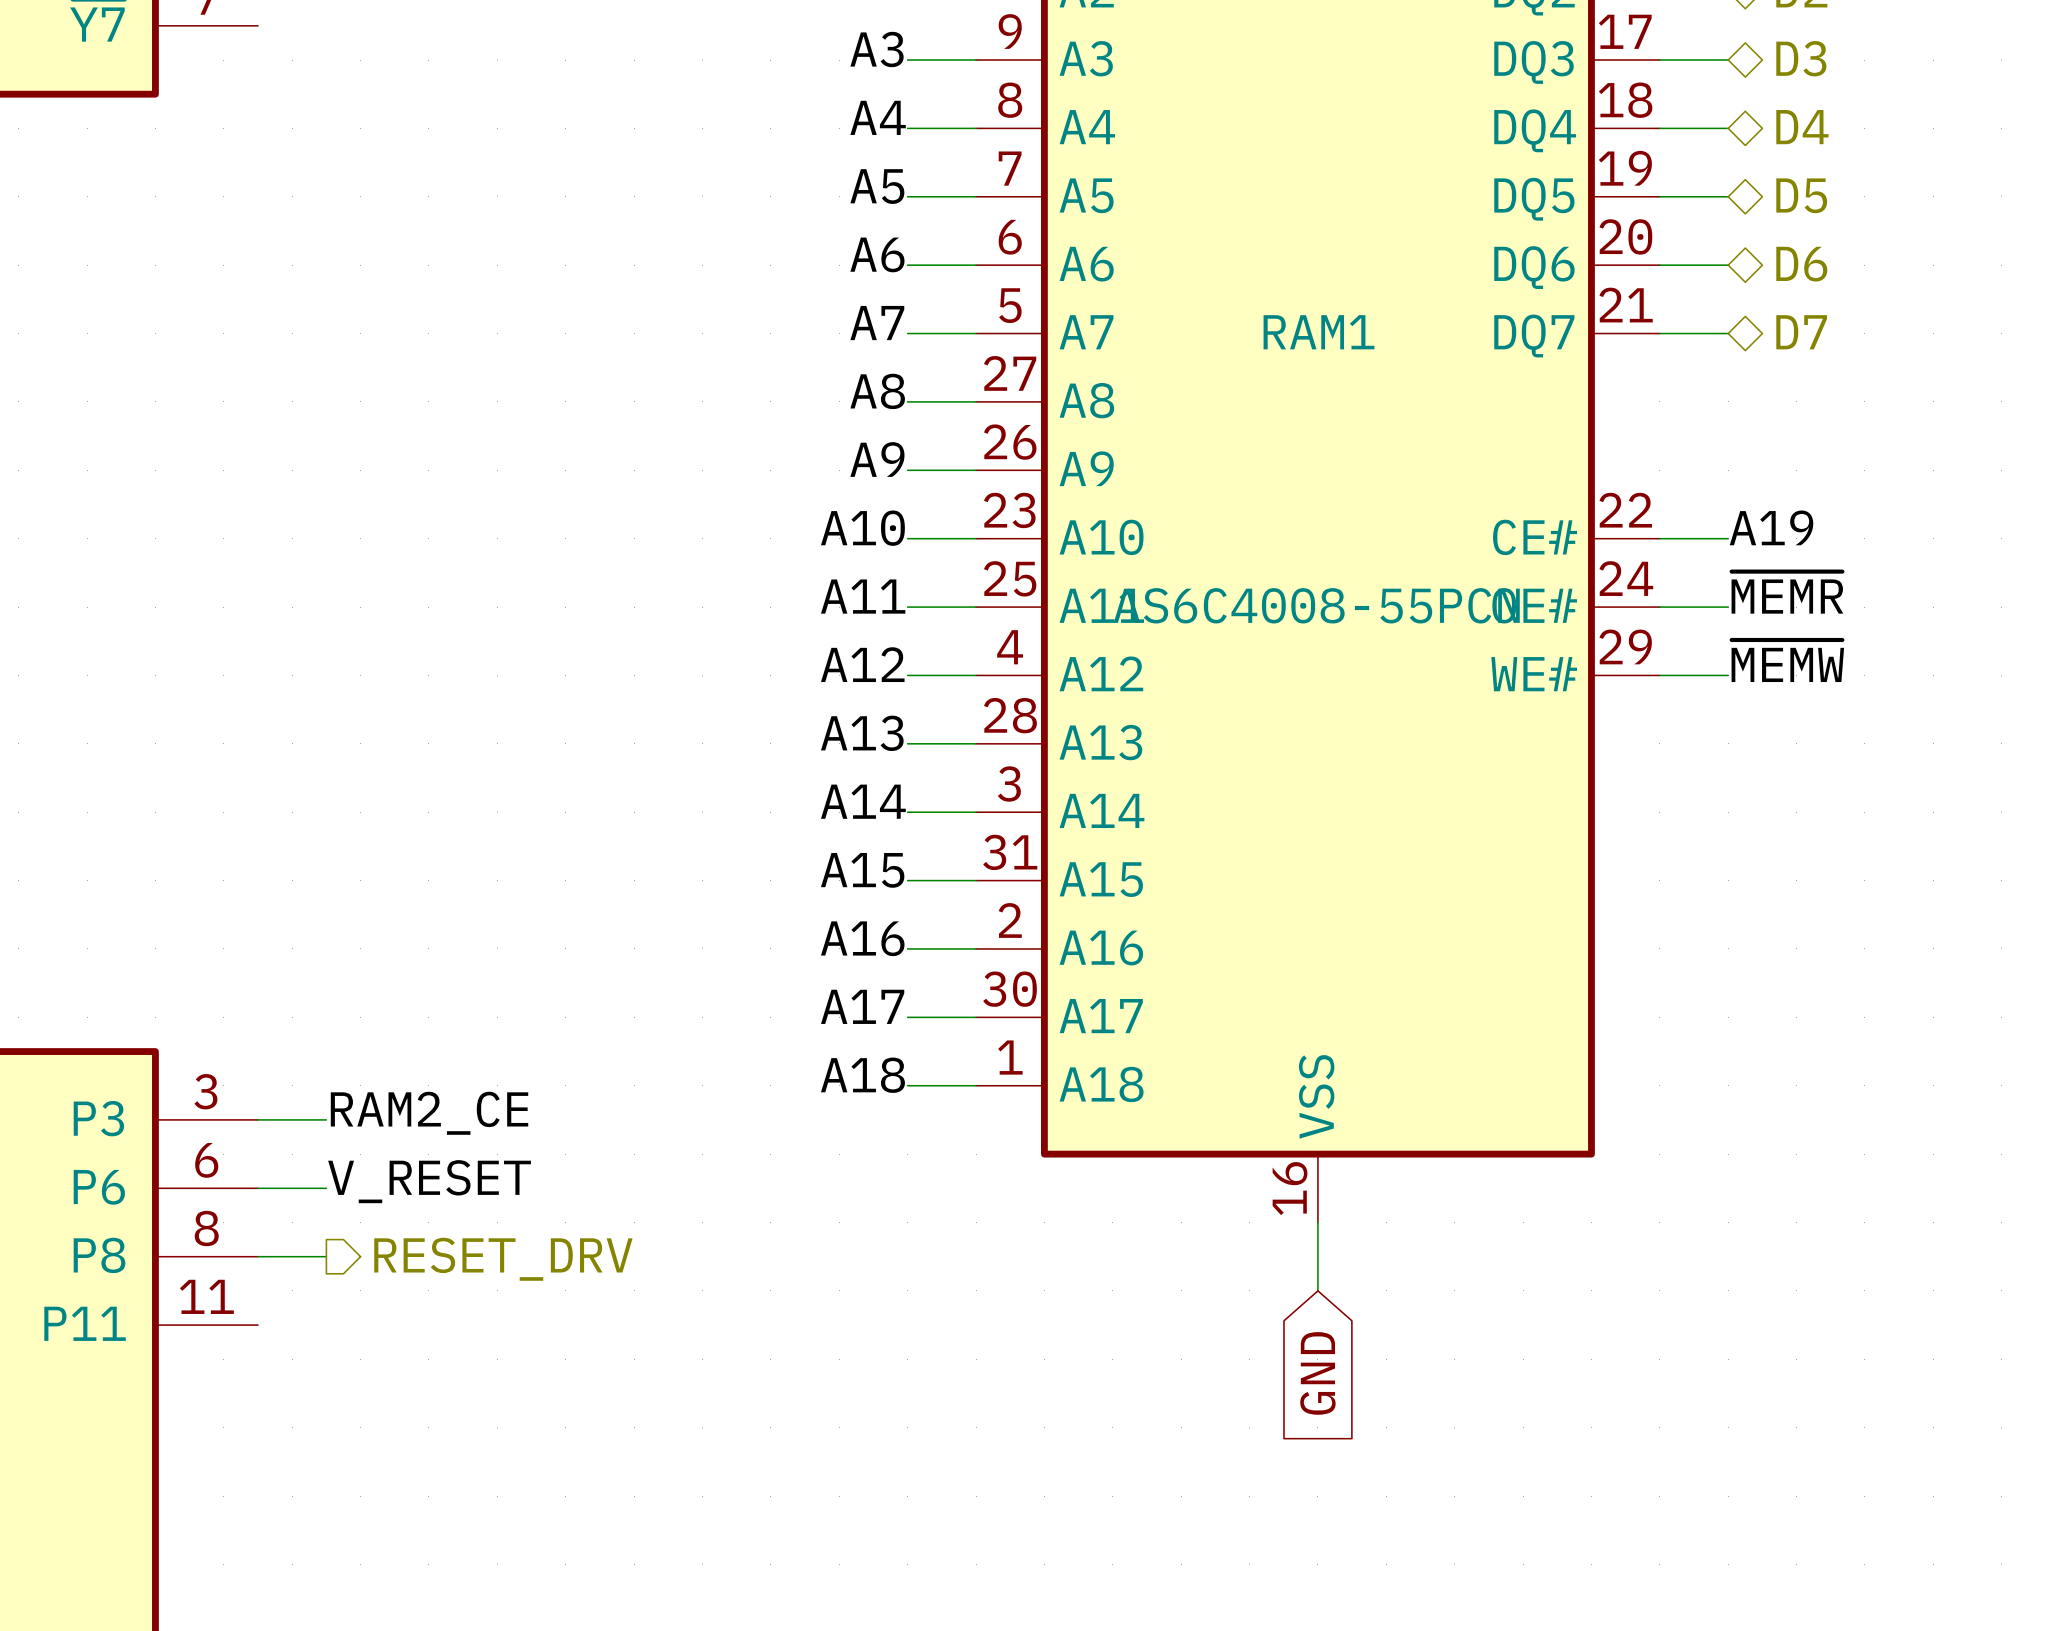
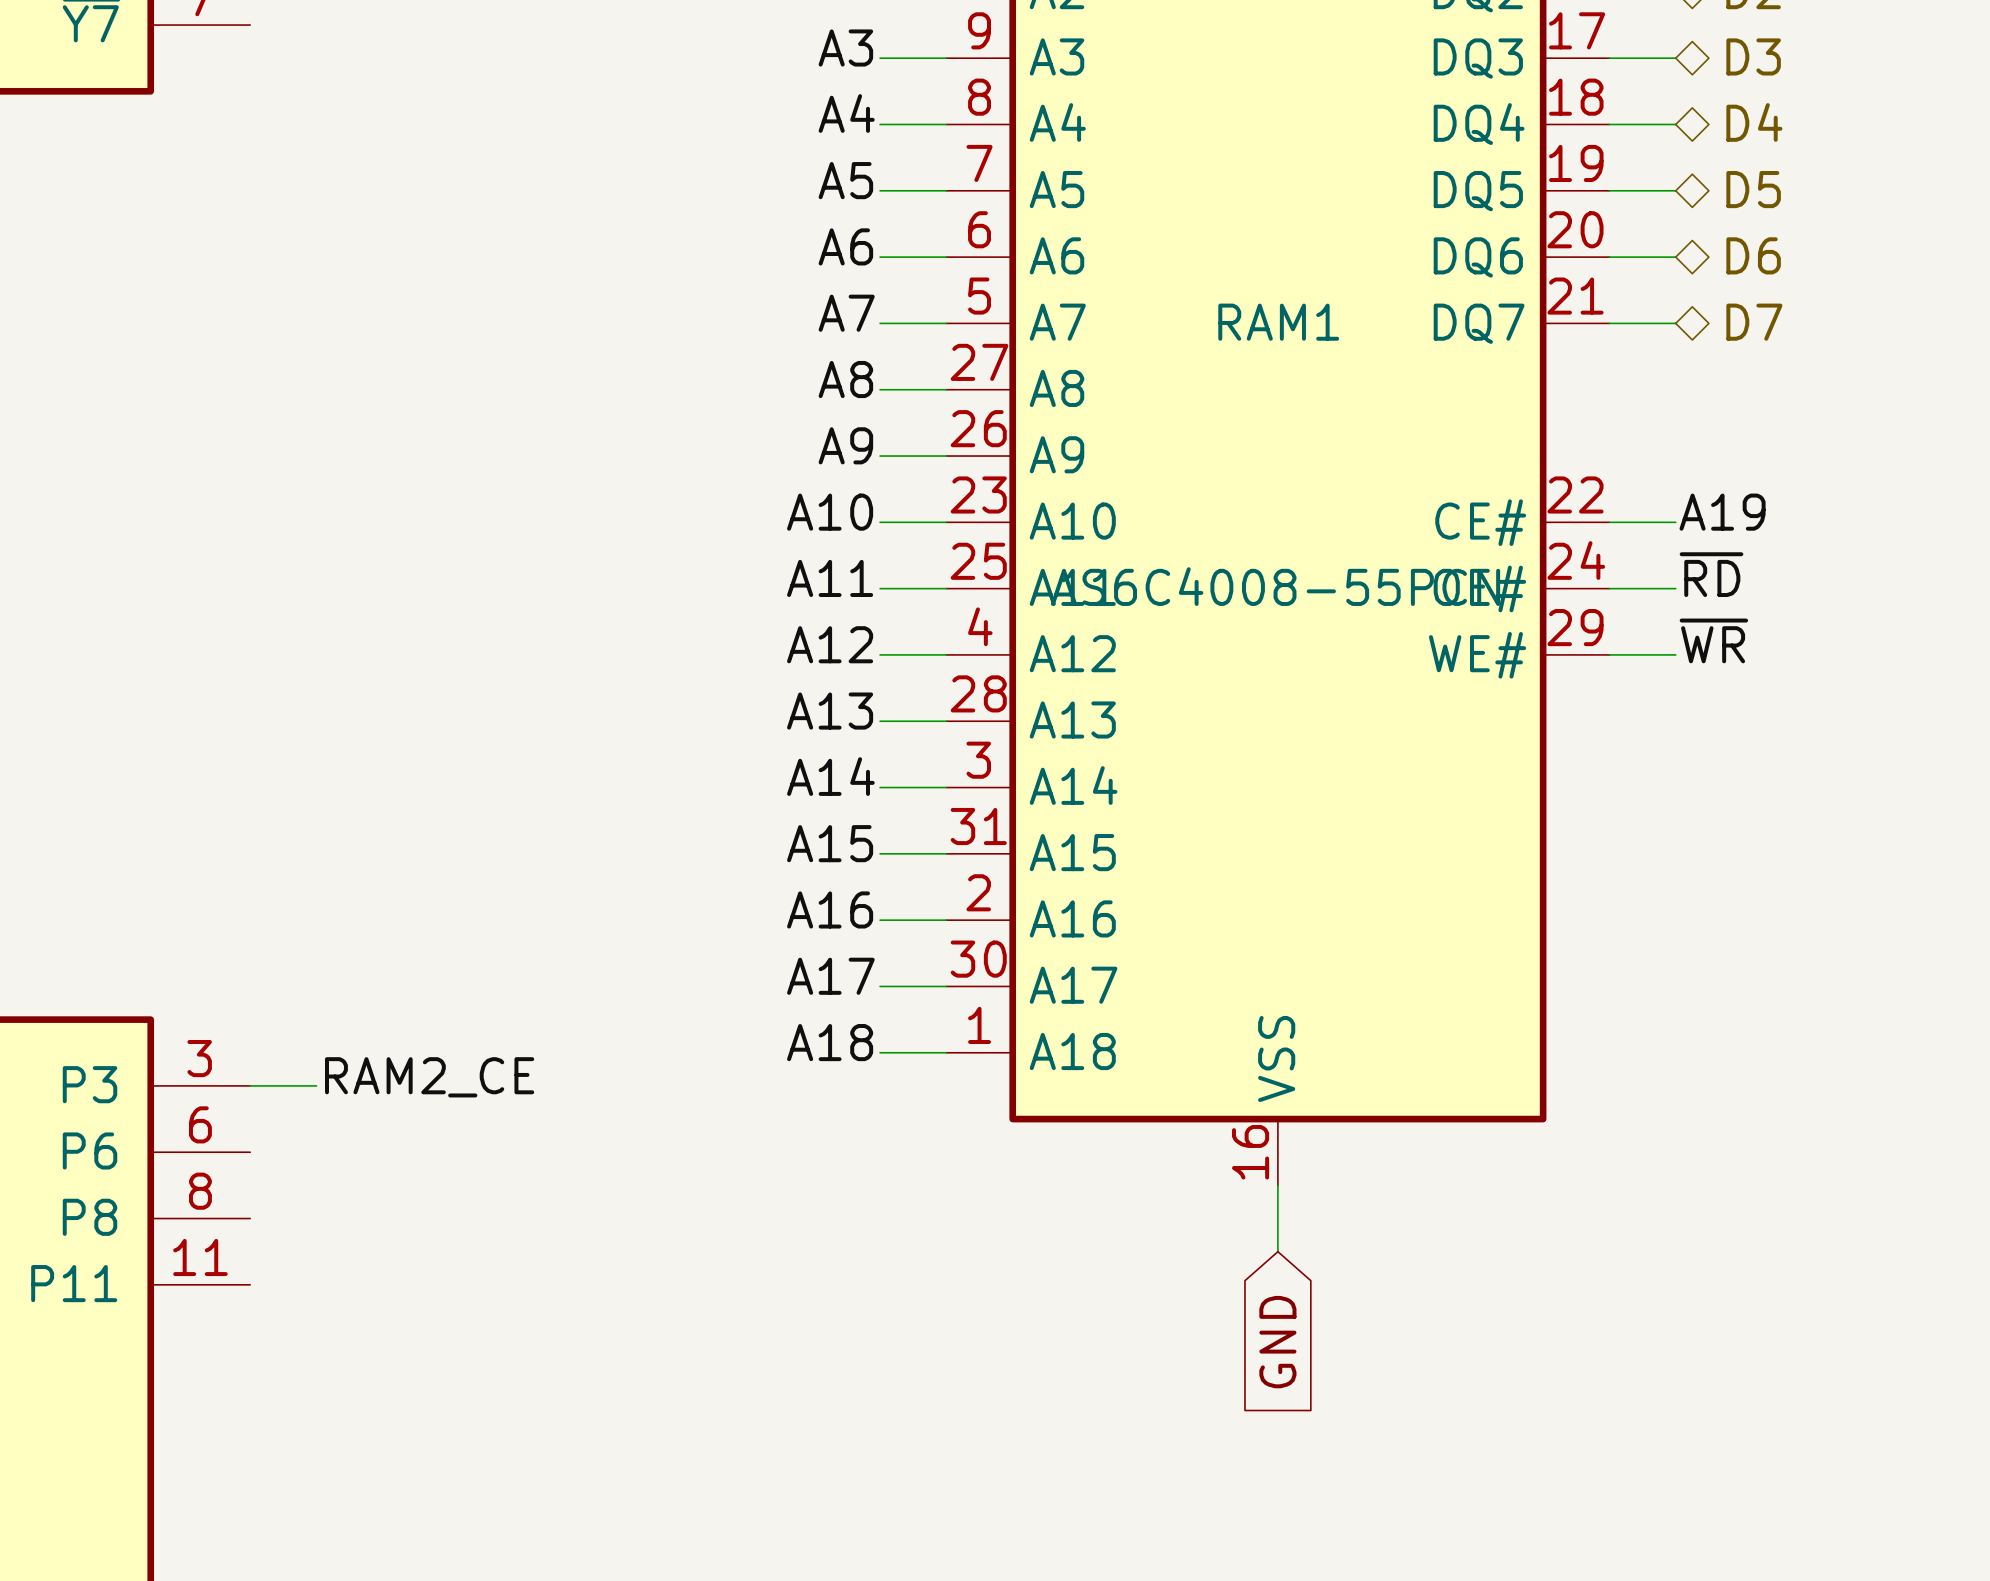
label: ~{MEMR} (1787, 592) -> ~{RD} (1711, 574)
label: ~{MEMW} (1787, 661) -> ~{WR} (1713, 640)
label: V_RESET (429, 1181) -> none
wire: (258, 1188) (326, 1188) -> none
wire: (258, 1256) (326, 1256) -> none
hierarchical label: RESET_DRV (503, 1259) -> none

